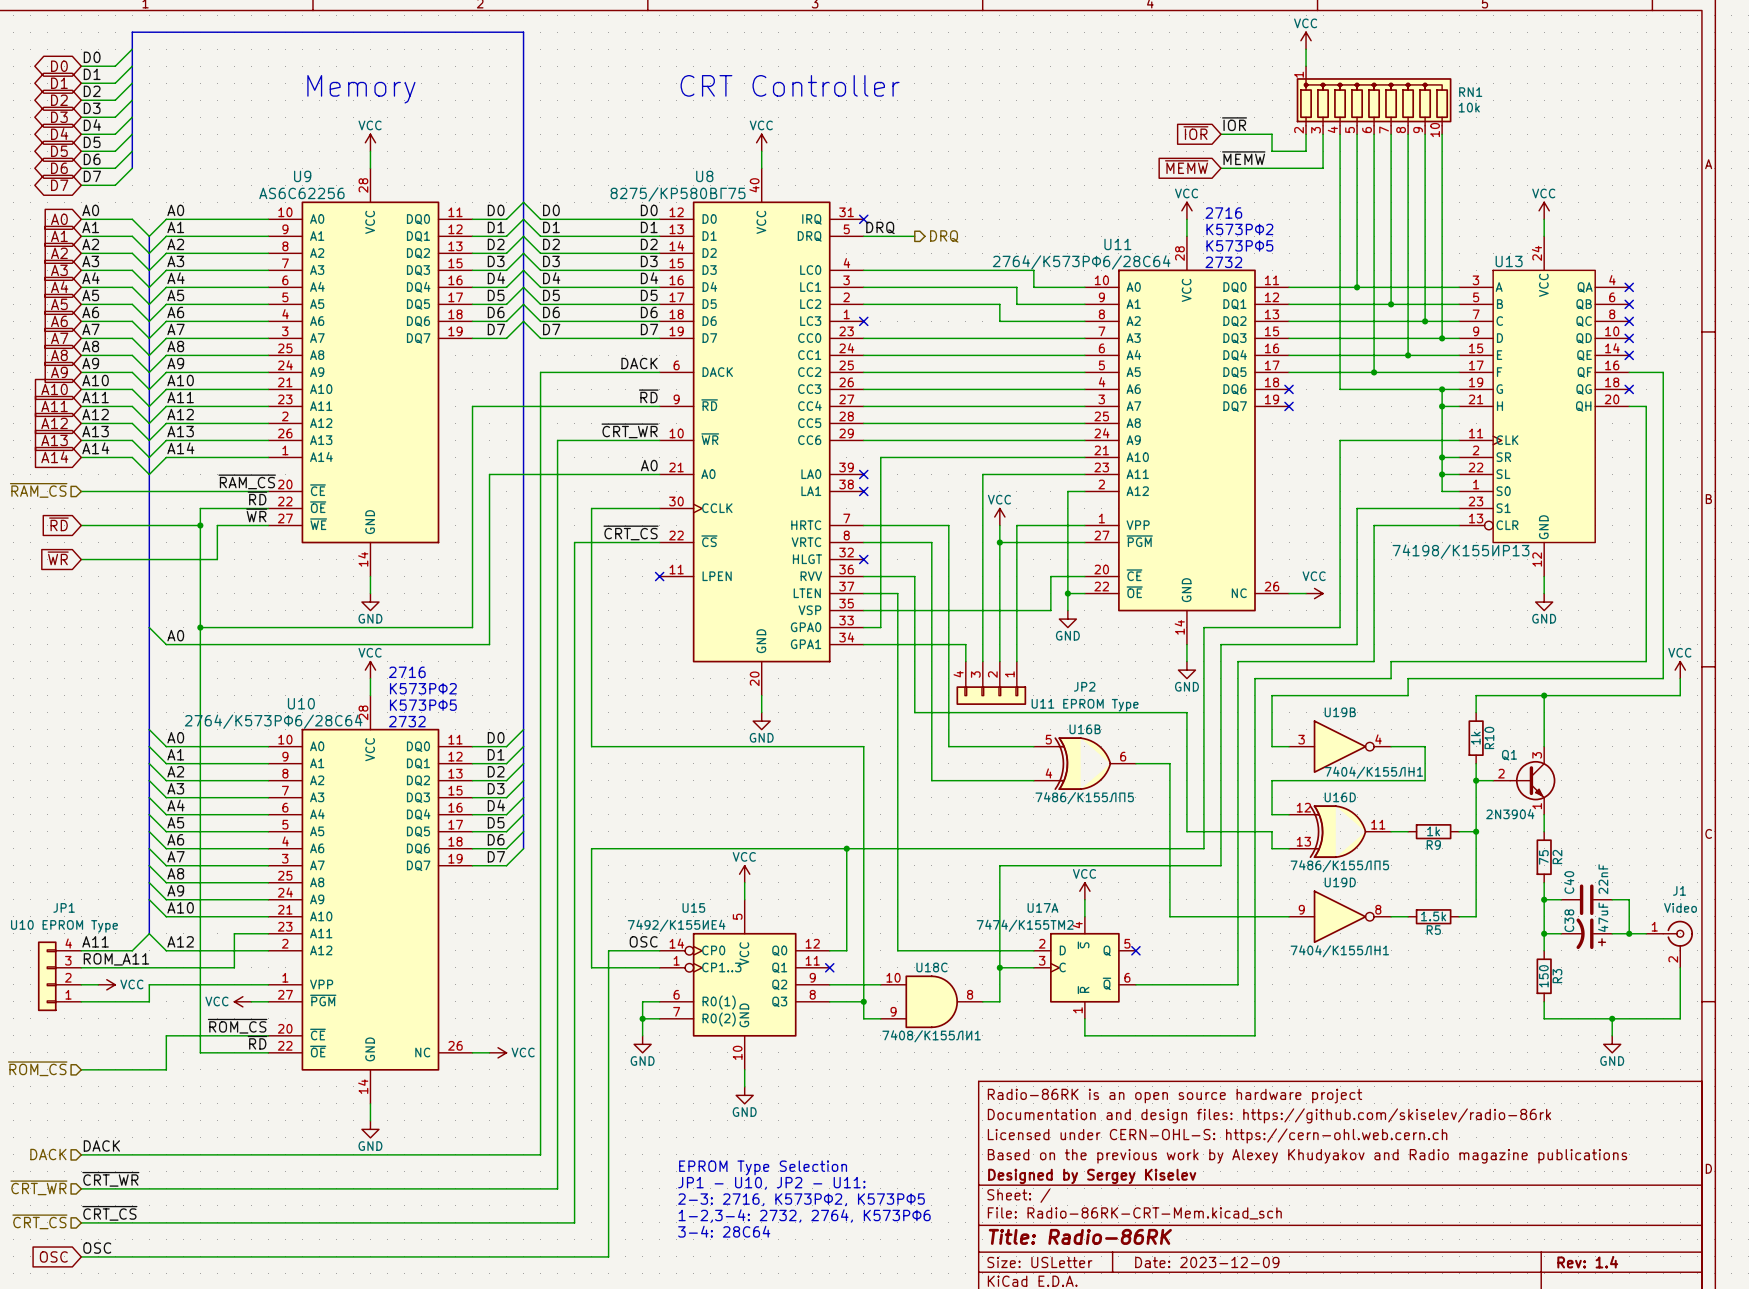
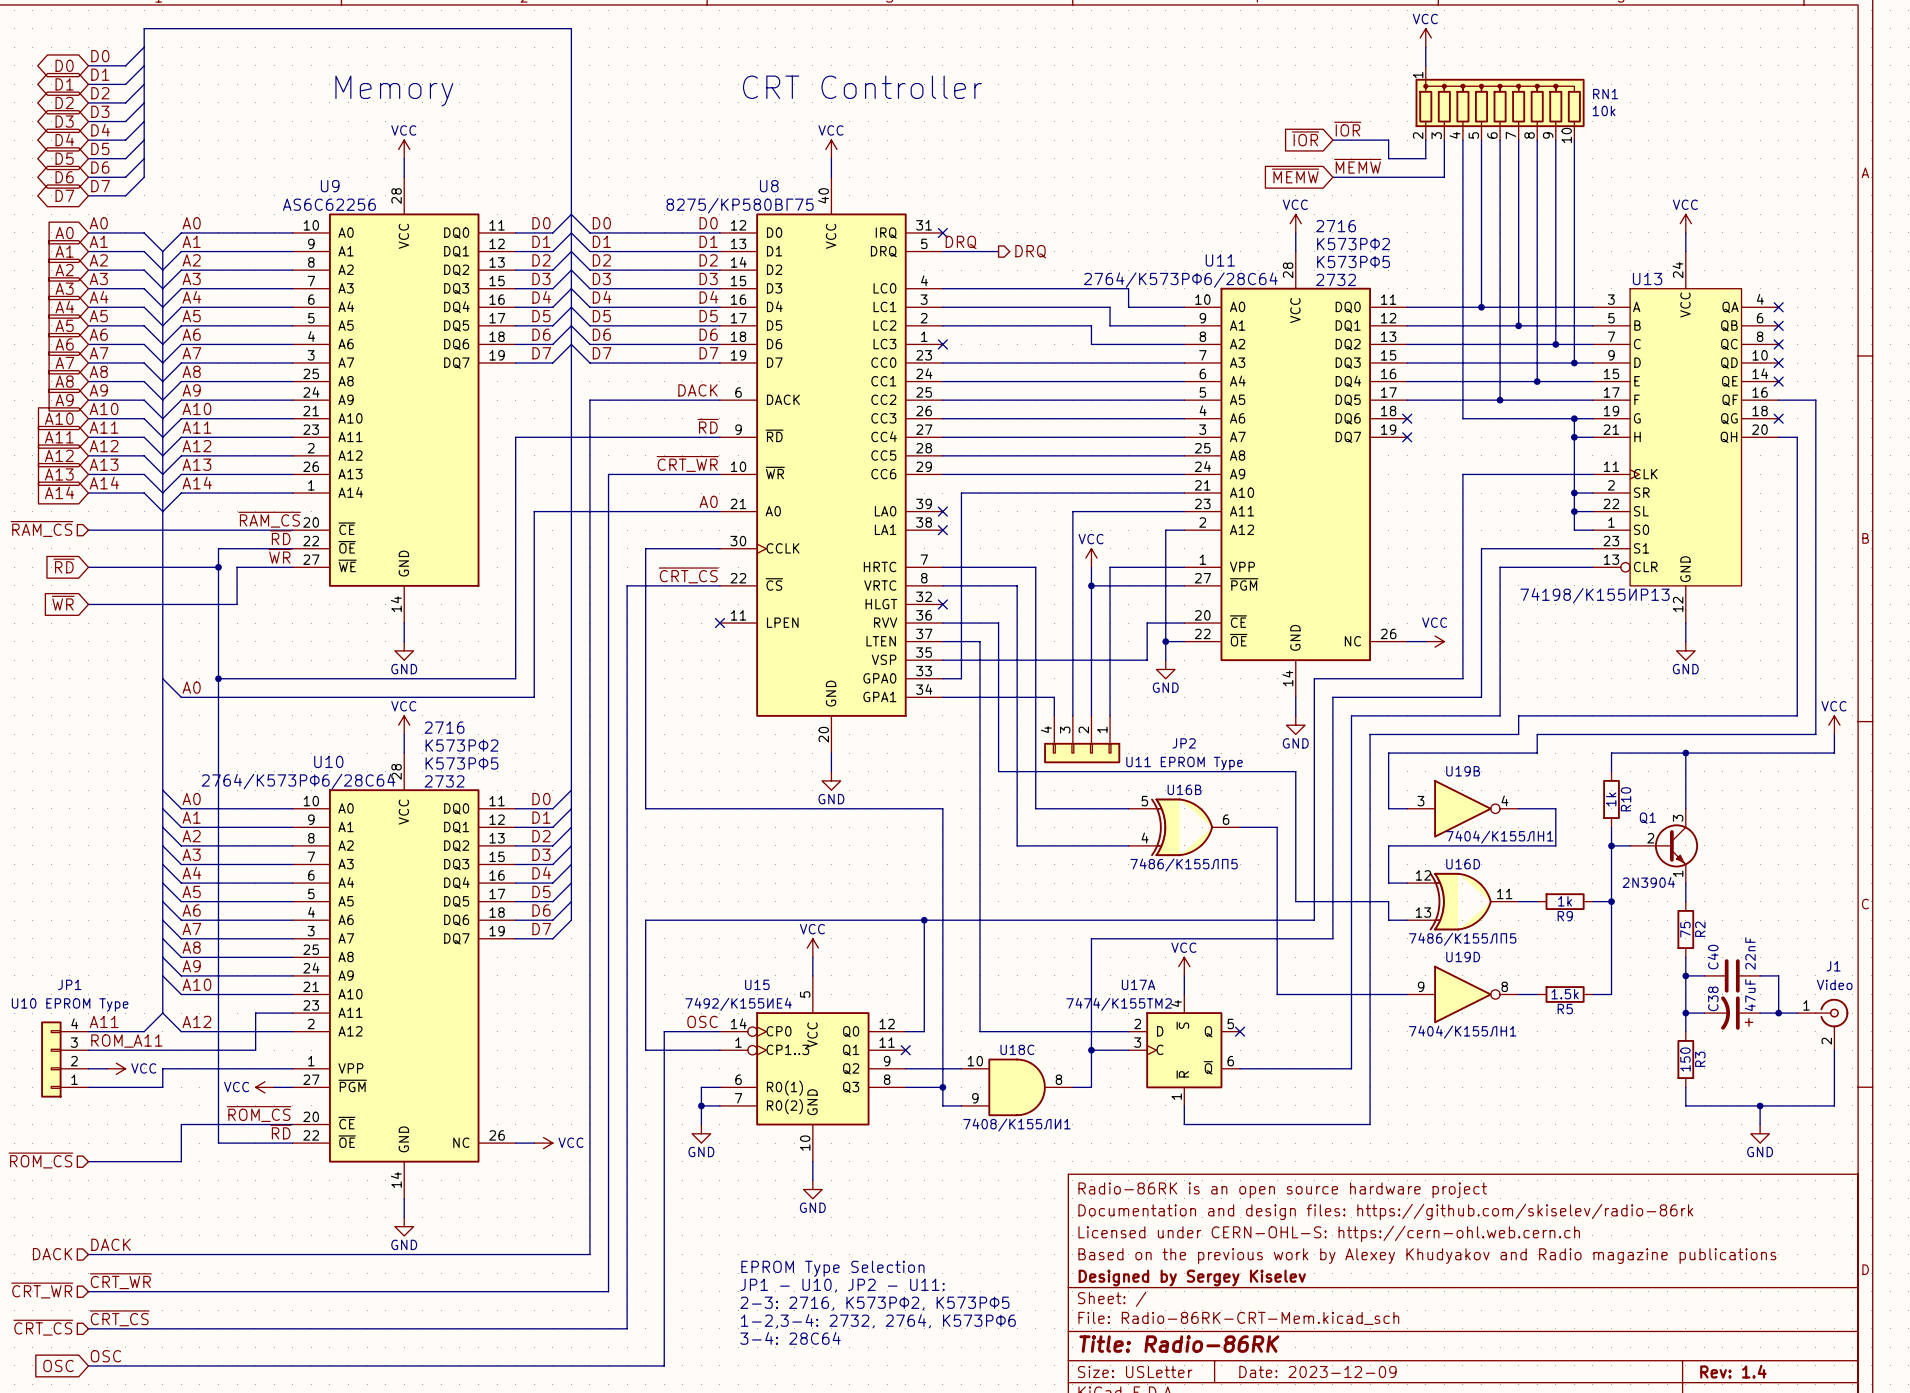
Q1 symbol: [1493, 746, 1556, 815] -> [1630, 808, 1699, 884]

